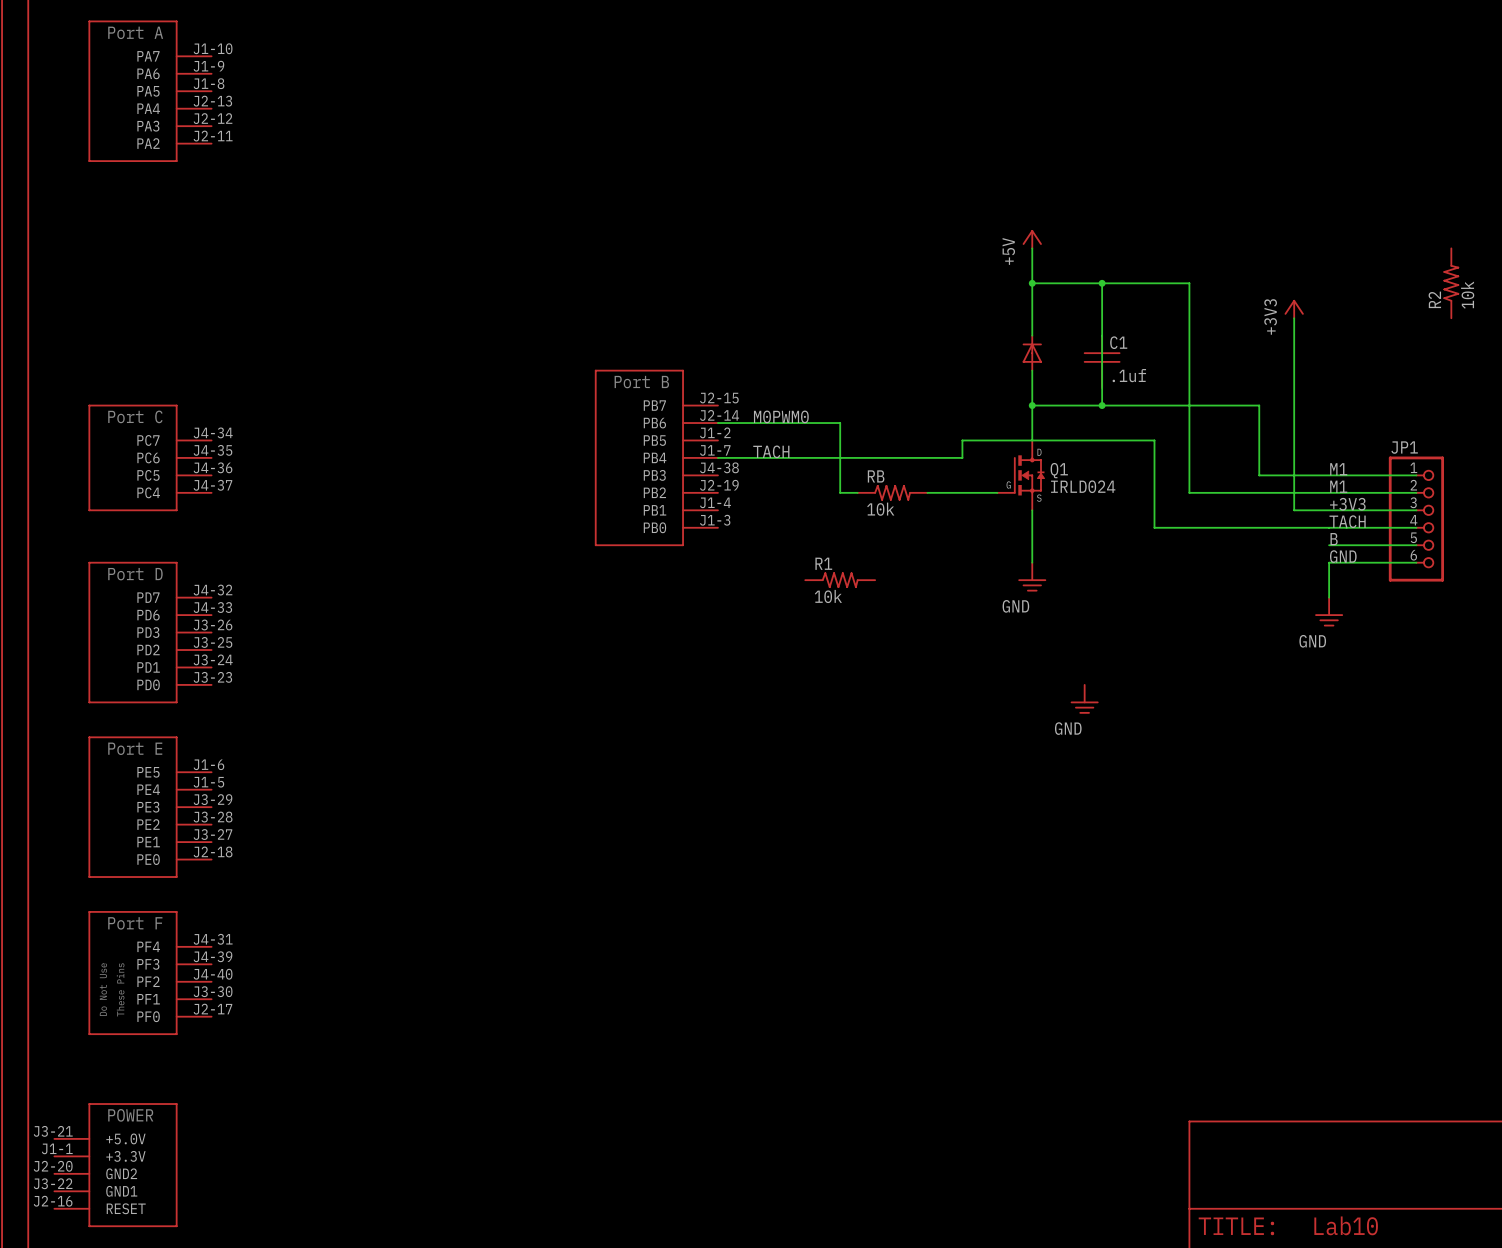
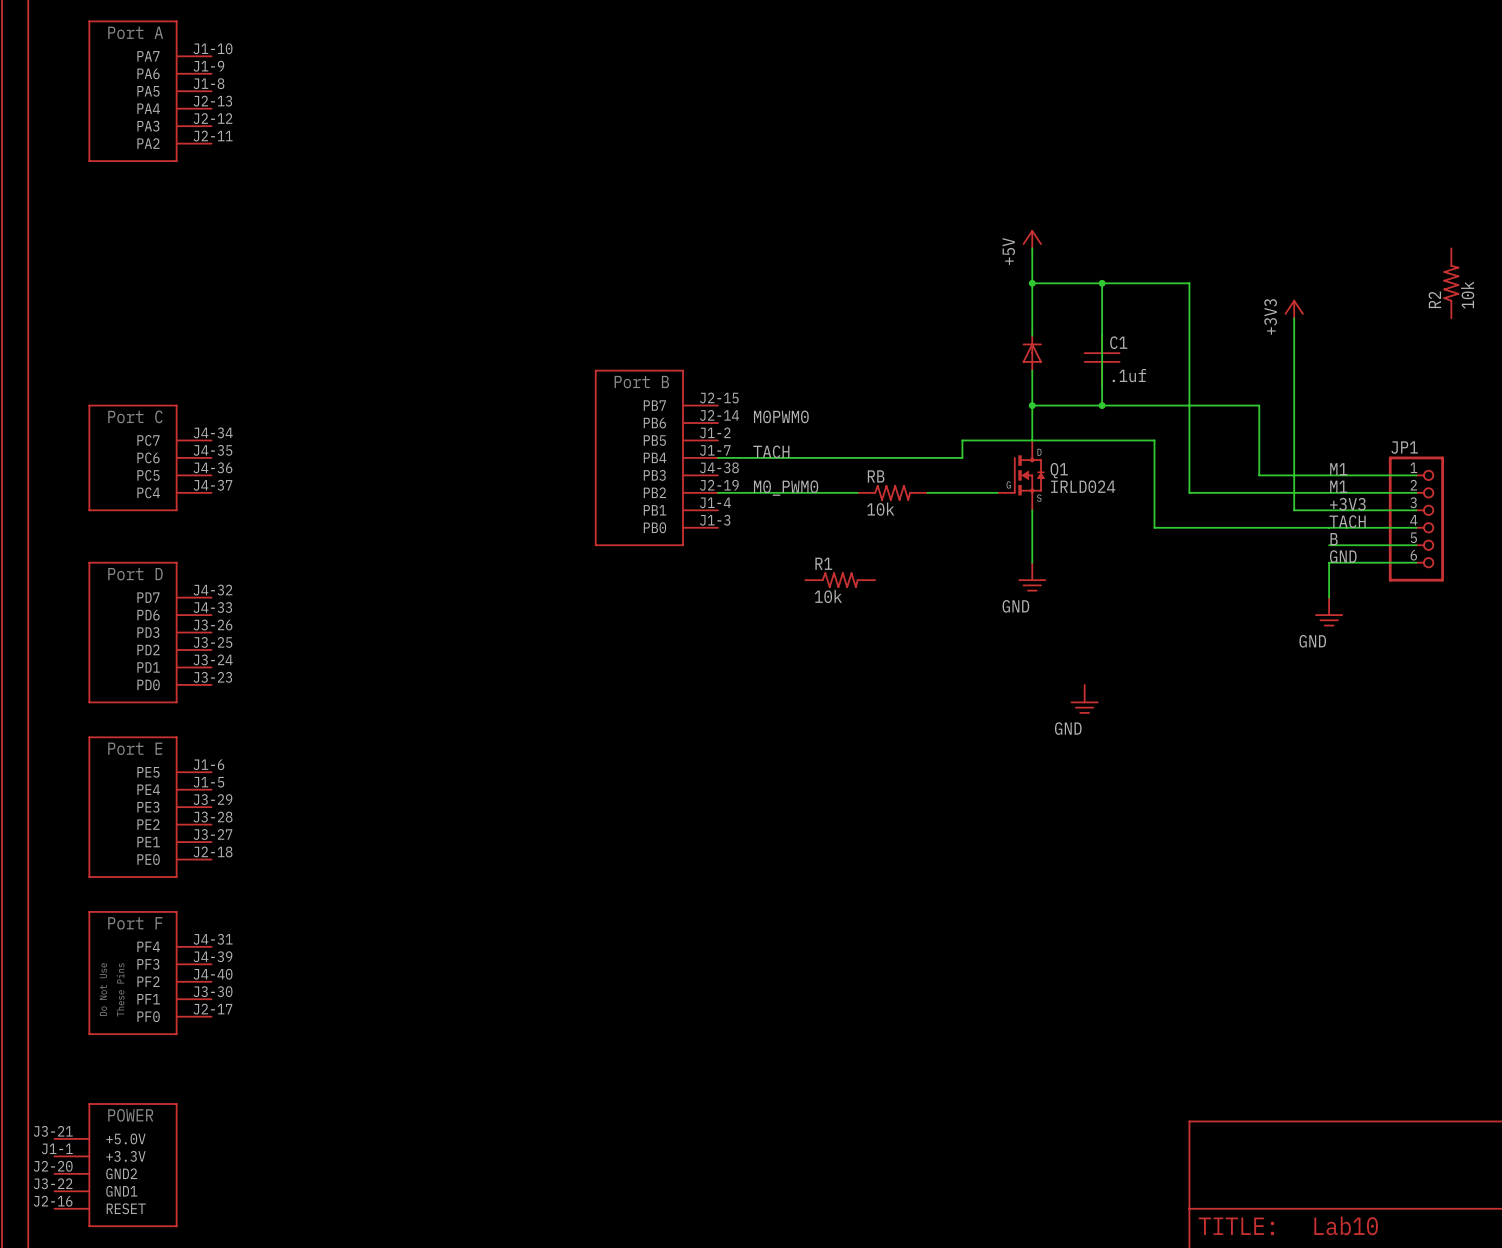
wire: (717, 423) (840, 423) (840, 492) -> (717, 492) (840, 492)
label: none -> M0_PWM0 (786, 488)

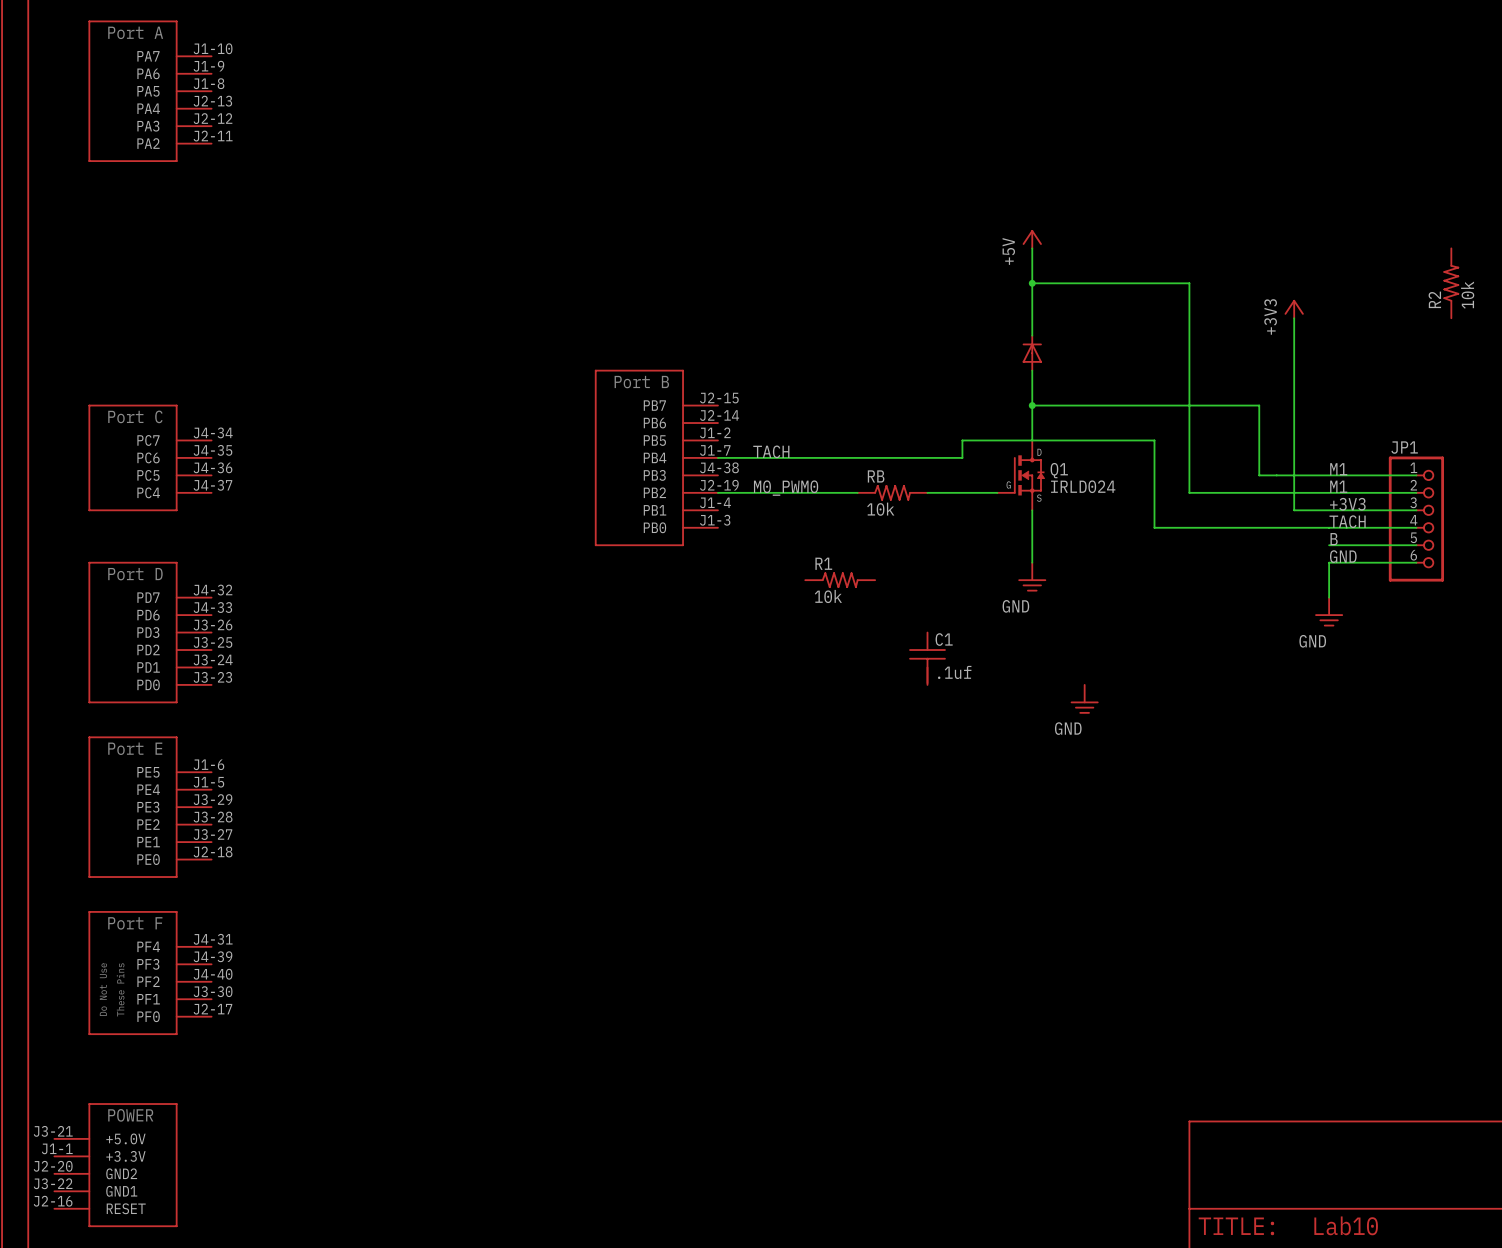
wire: (1102, 283) (1102, 405) -> none
junction: (1102, 283) -> none
C1 position: (1102, 361) -> (927, 658)
junction: (1102, 405) -> none
label: M0PWM0 (781, 416) -> none

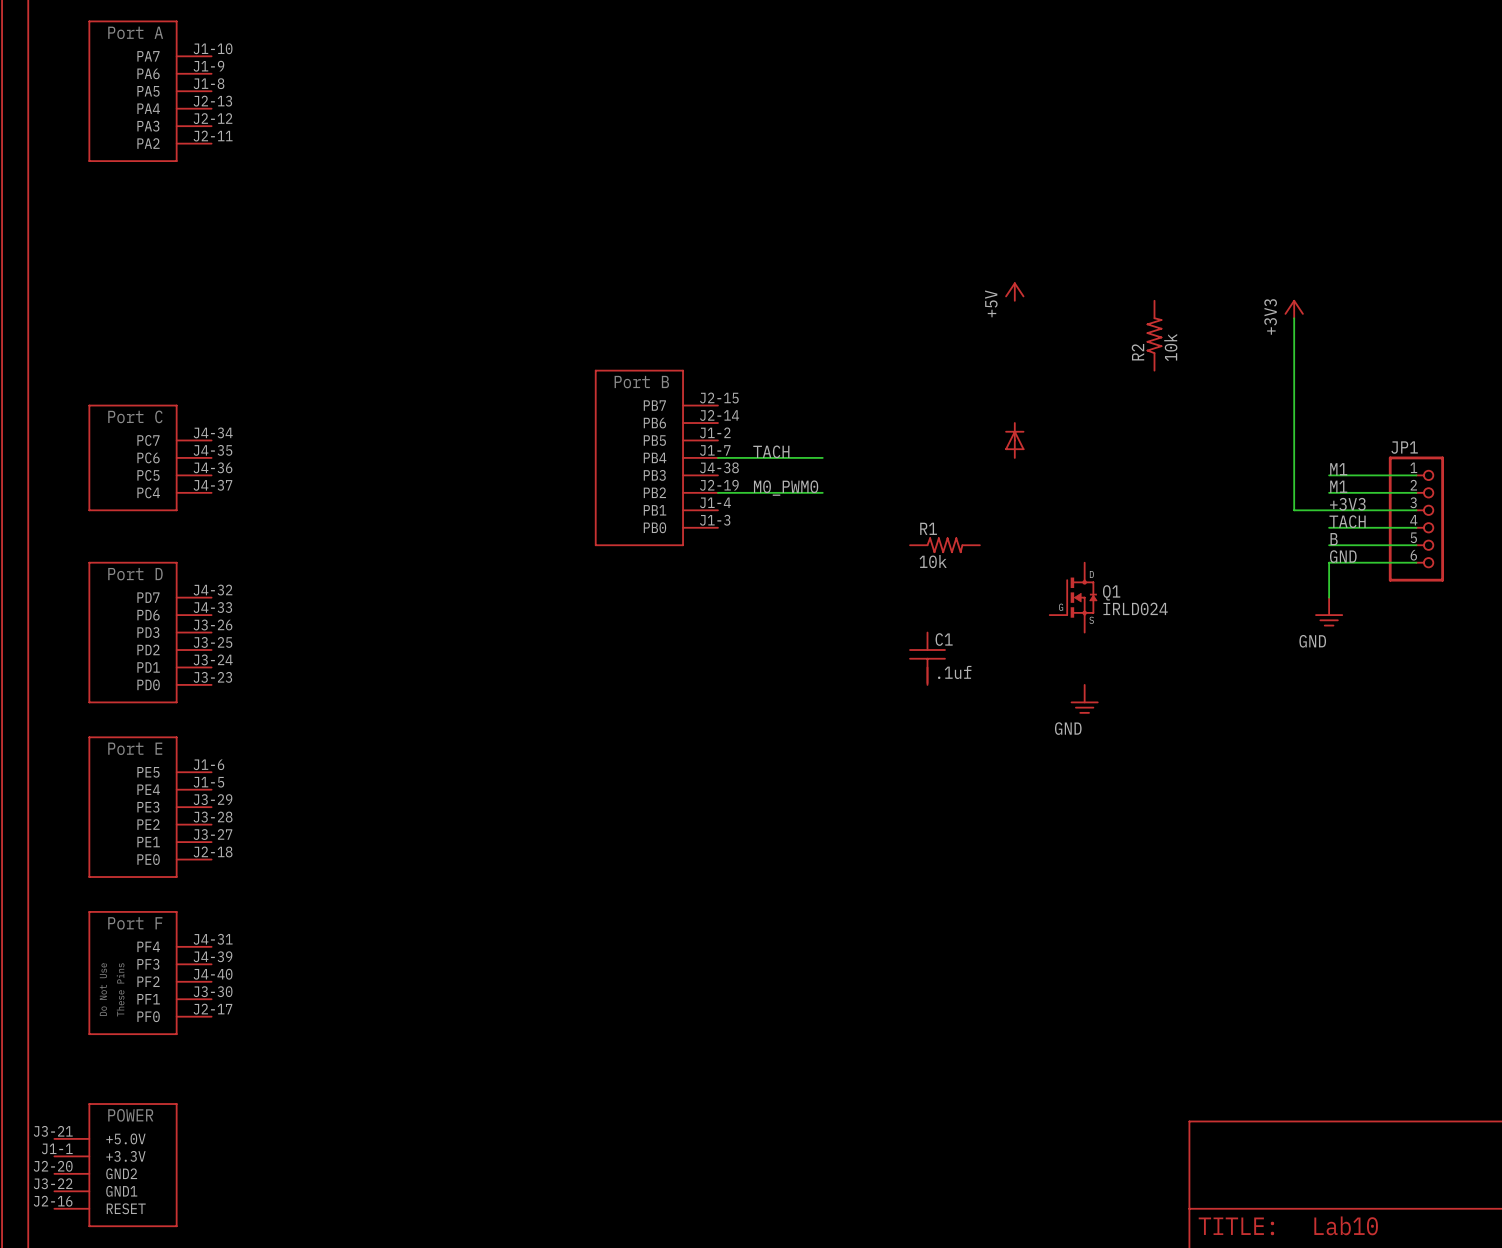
power symbol position: +5V (1032, 239) -> +5V (1014, 291)
wire: (1032, 248) (1032, 335) -> none
wire: (1032, 283) (1189, 283) (1189, 492) (1329, 492) -> none
junction: (1032, 283) -> none
R2 position: (1451, 283) -> (1154, 335)
part position: (1032, 353) -> (1014, 440)
wire: (1032, 370) (1032, 440) -> none
wire: (1032, 405) (1259, 405) (1259, 475) (1329, 475) -> none
junction: (1032, 405) -> none
wire: (822, 457) (962, 457) (962, 440) (1154, 440) (1154, 527) (1329, 527) -> none
Q1 position: (1021, 475) -> (1073, 597)
wire: (822, 492) (857, 492) -> none
RB: 10k (892, 492) -> none
wire: (927, 492) (997, 492) -> none
wire: (1032, 510) (1032, 562) -> none
power symbol: GND (1032, 577) -> none
R1 position: (840, 580) -> (944, 545)

